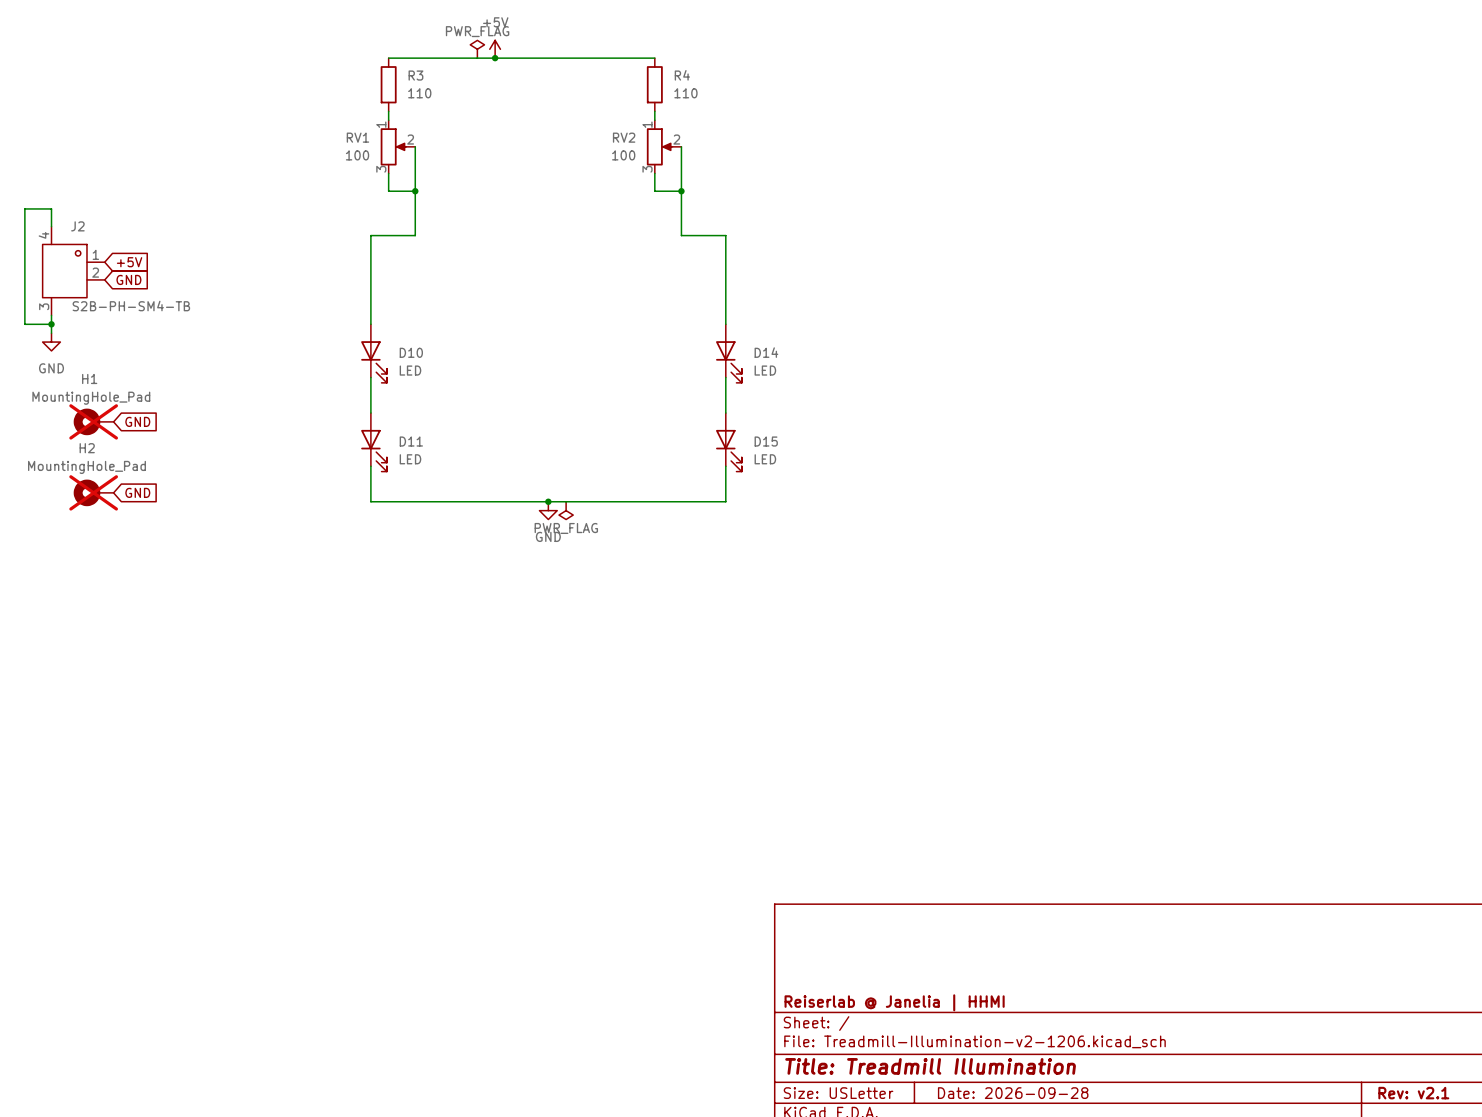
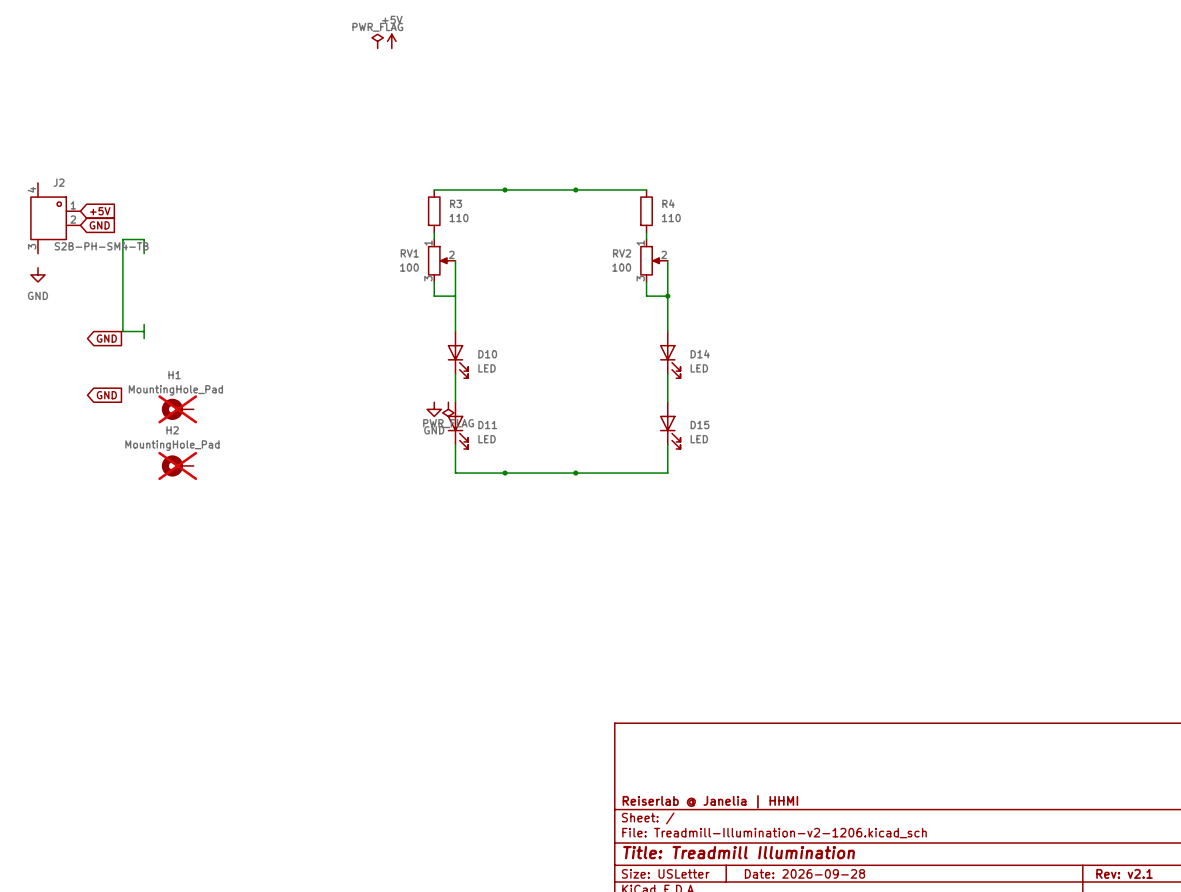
wire: (388, 58) (654, 58) -> none
junction: (495, 58) -> none
R3 position: (388, 84) -> (434, 211)
R4 position: (654, 84) -> (646, 211)
wire: (388, 111) (388, 120) -> none
wire: (654, 111) (654, 120) -> none
RV1 position: (397, 146) -> (441, 260)
wire: (415, 146) (415, 235) (370, 235) (370, 324) -> none
RV2 position: (664, 146) -> (653, 260)
wire: (681, 146) (681, 235) -> (434, 190) (540, 190)
wire: (388, 173) (388, 191) (415, 191) -> none
wire: (654, 173) (654, 191) (681, 191) -> none
junction: (415, 191) -> none
junction: (681, 191) -> none
wire: (51, 226) (51, 208) (24, 208) (24, 324) (51, 324) -> (144, 253) (144, 239) (122, 239) (122, 331) (144, 331)
junction: none -> (505, 190)
wire: (725, 235) (725, 324) -> (575, 190) (646, 190)
junction: none -> (575, 190)
wire: none -> (434, 232) (434, 239)
wire: none -> (646, 232) (646, 239)
wire: (51, 315) (51, 333) -> (144, 324) (144, 338)
junction: (51, 324) -> none
wire: none -> (455, 260) (455, 331)
wire: none -> (667, 260) (667, 331)
wire: none -> (434, 281) (434, 296) (455, 296)
wire: none -> (646, 281) (646, 296) (667, 296)
D10 position: (374, 353) -> (457, 354)
D14 position: (728, 353) -> (670, 354)
junction: none -> (667, 296)
wire: (370, 377) (370, 413) -> none
wire: (725, 377) (725, 413) -> (667, 373) (667, 402)
H1 position: (93, 421) -> (177, 409)
D11 position: (374, 442) -> (457, 425)
D15 position: (728, 442) -> (670, 425)
wire: (370, 466) (370, 501) (725, 501) (725, 466) -> none
wire: none -> (455, 373) (455, 402)
H2 position: (93, 492) -> (177, 465)
junction: (548, 501) -> none
wire: none -> (455, 444) (455, 473) (667, 473) (667, 444)
junction: none -> (505, 473)
junction: none -> (575, 473)

